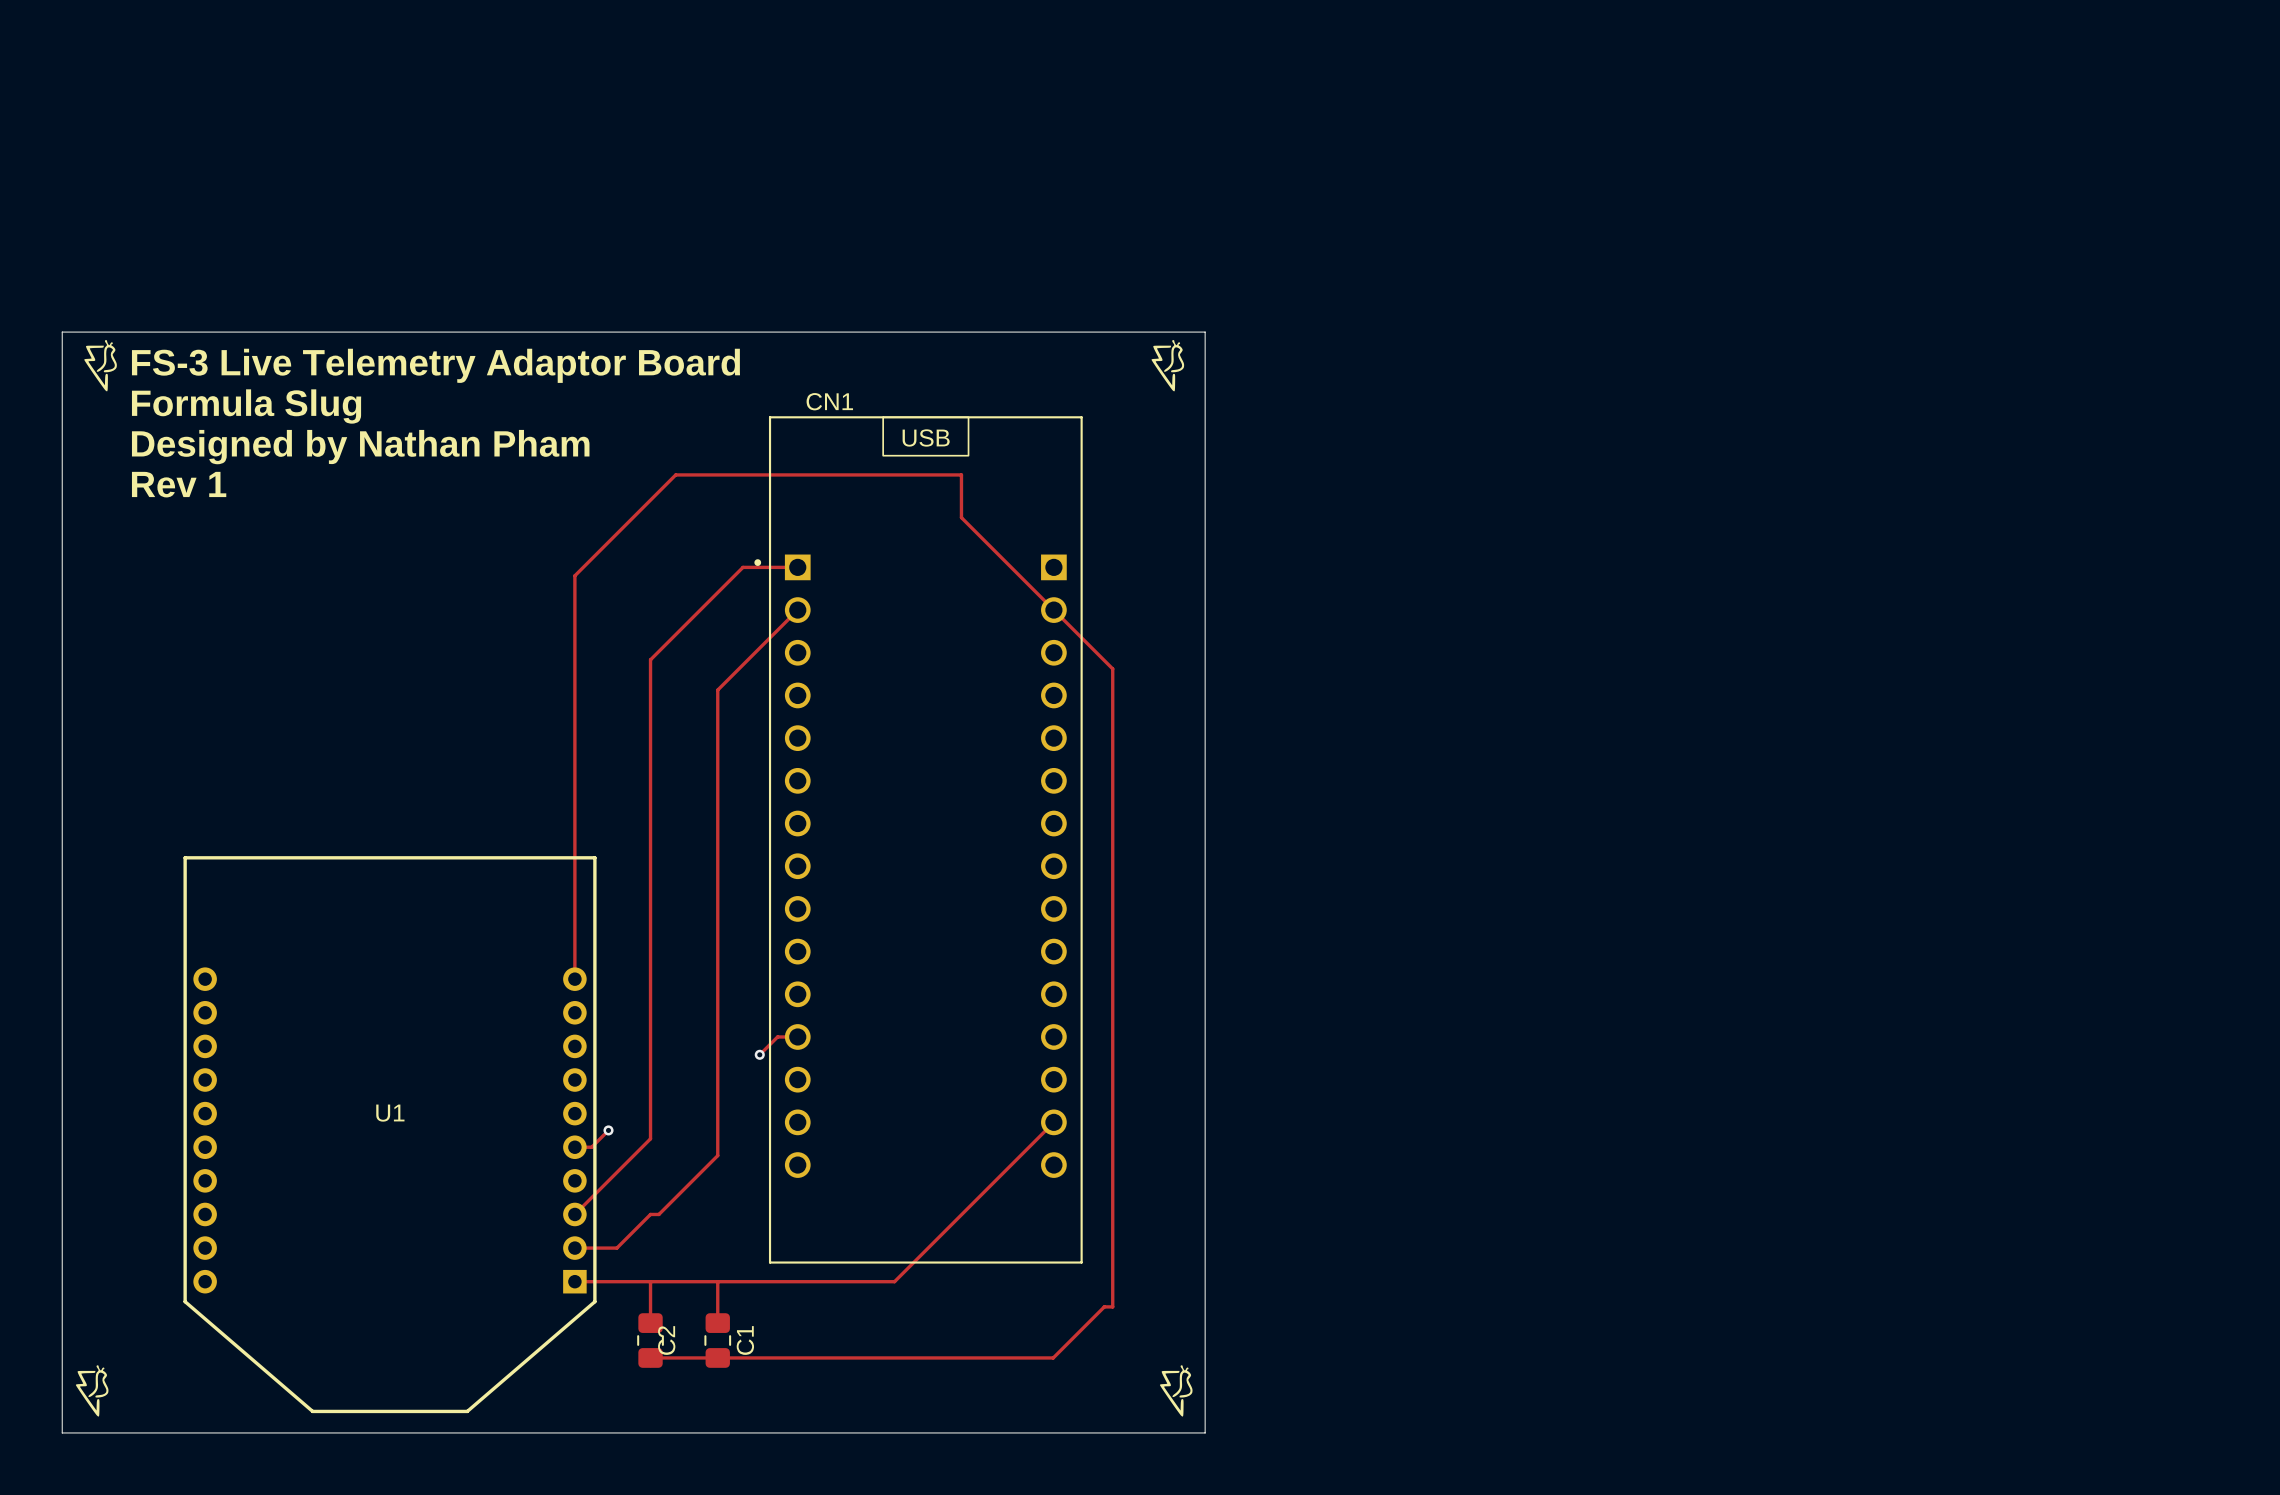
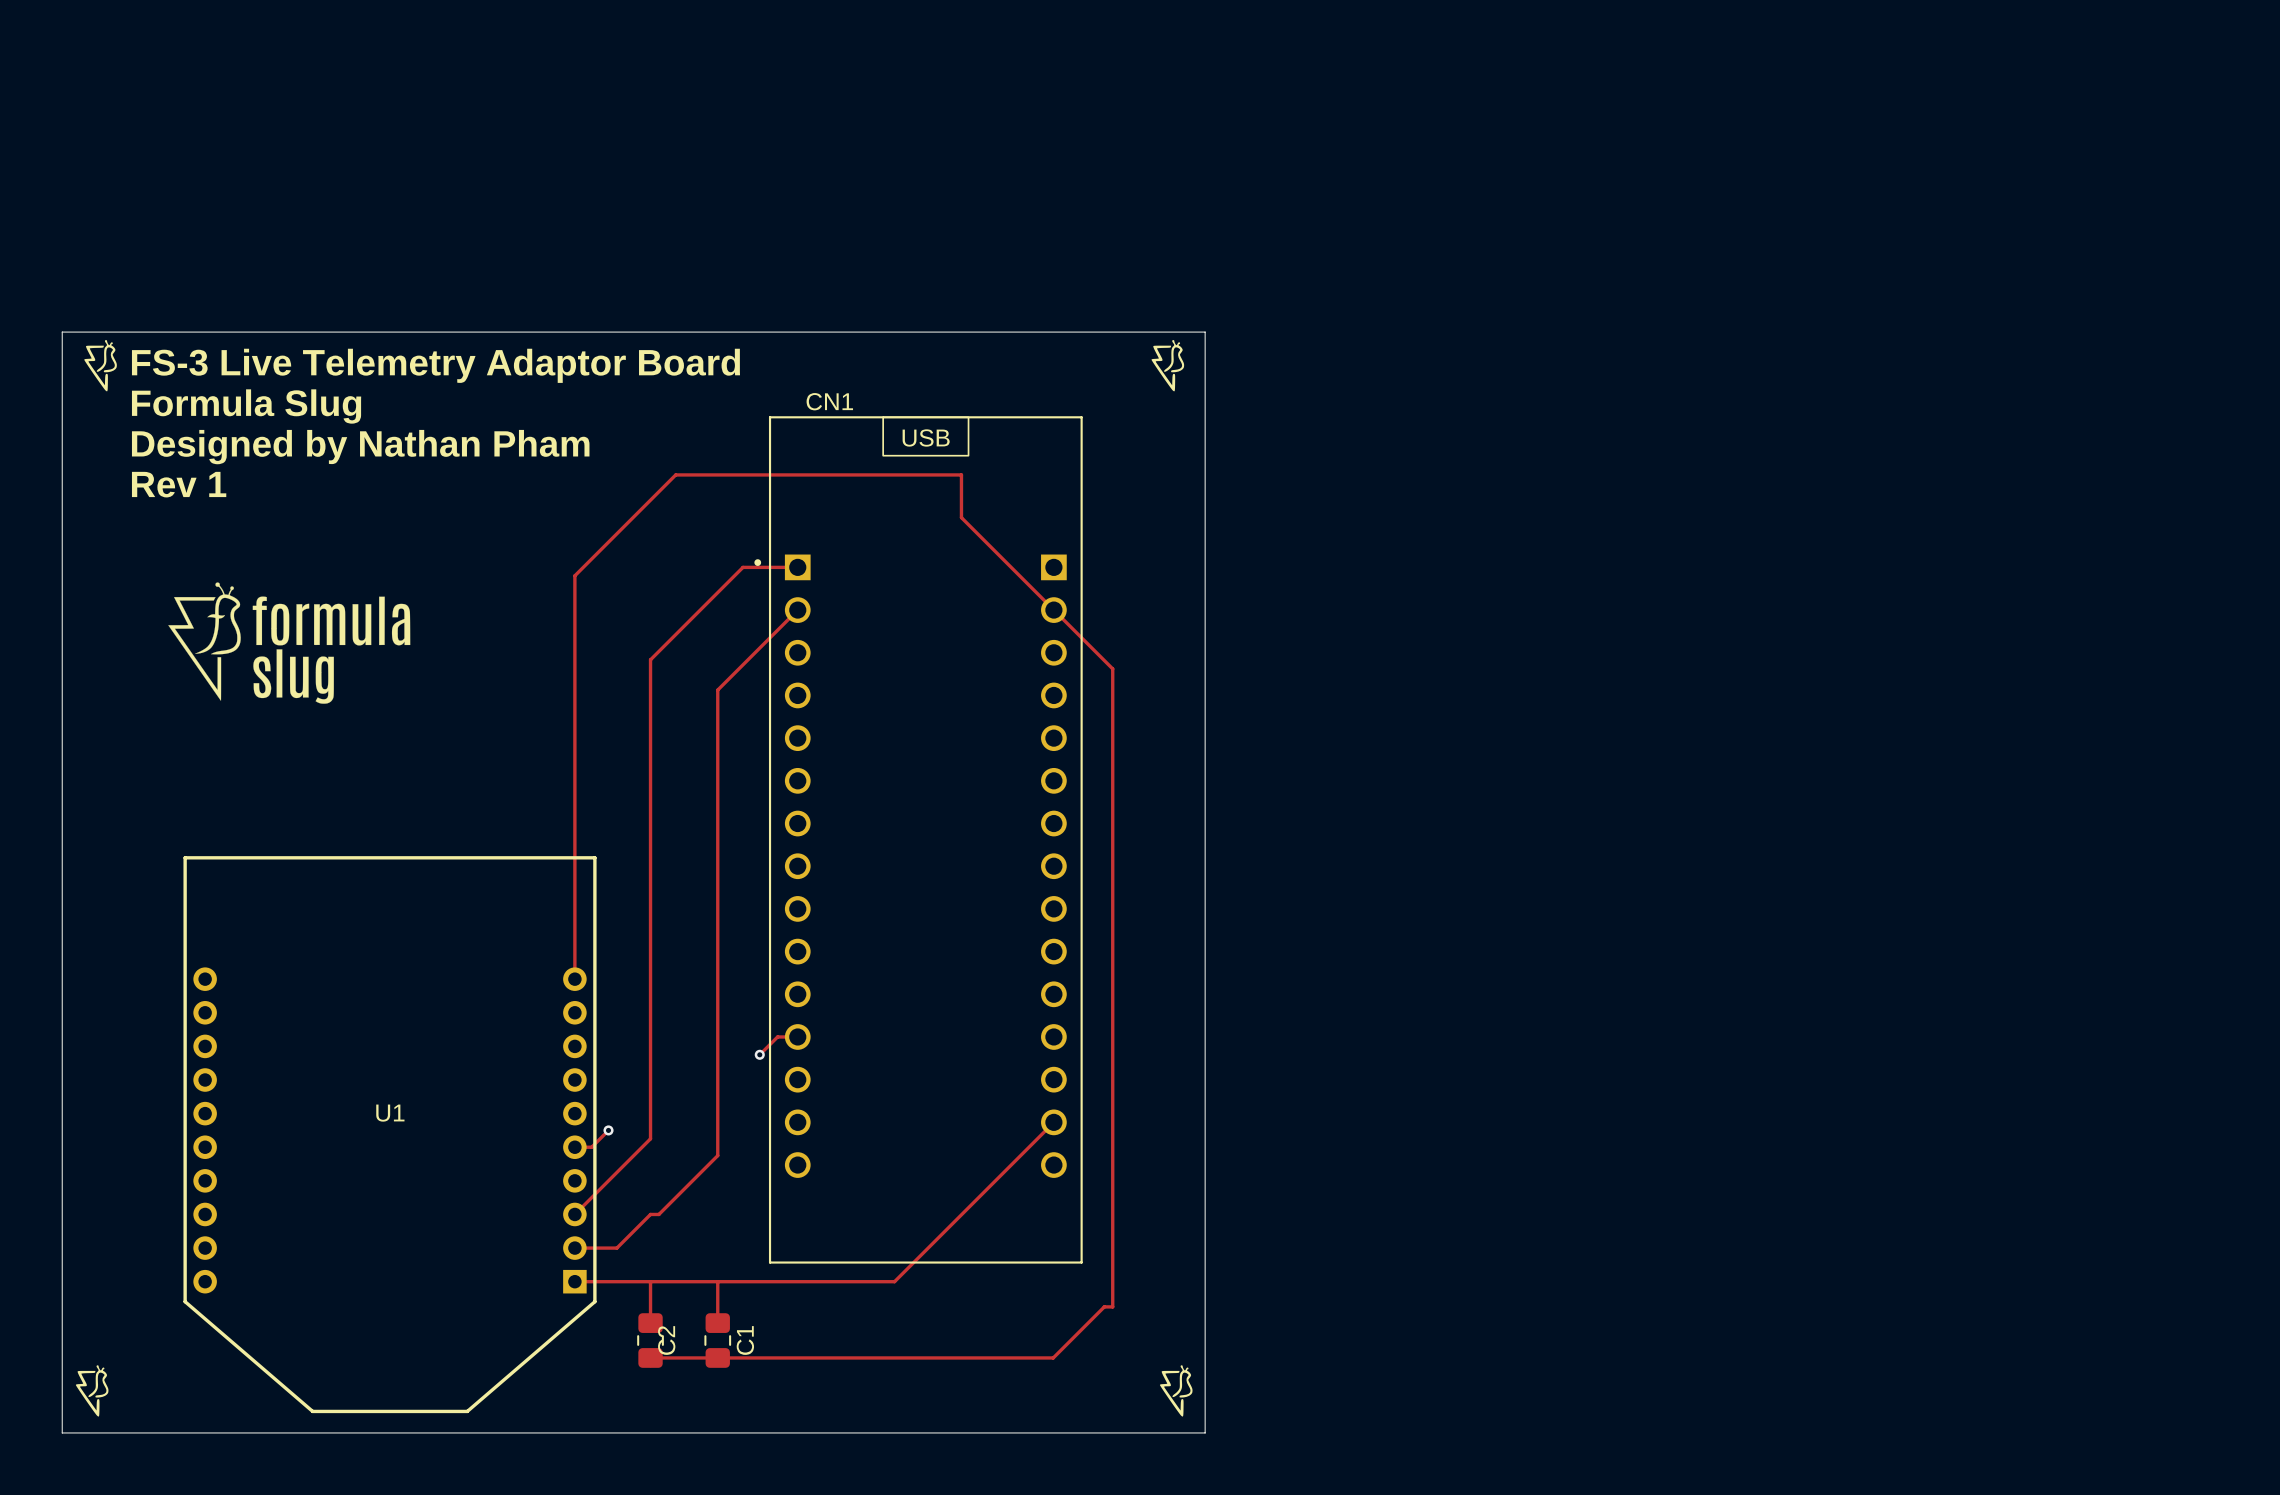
drawing: none -> [168, 582, 411, 704]

